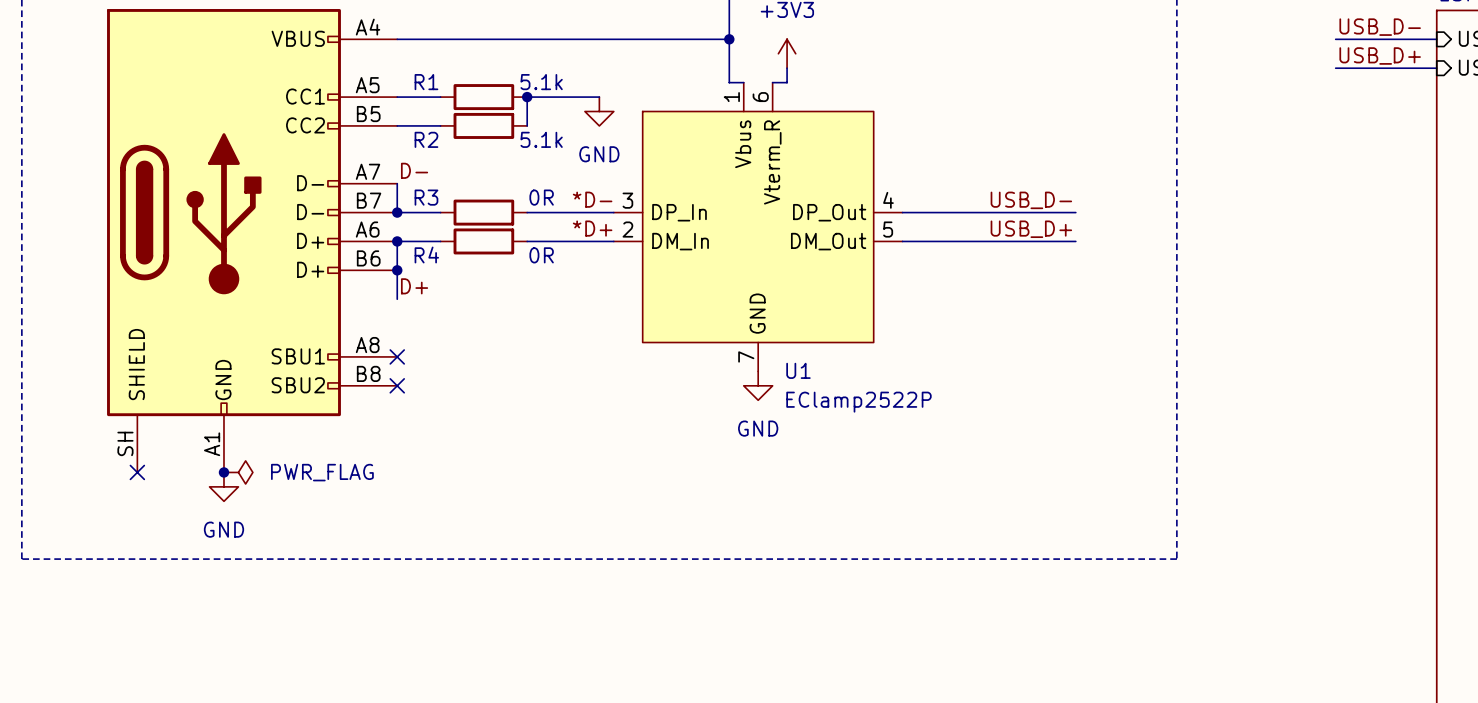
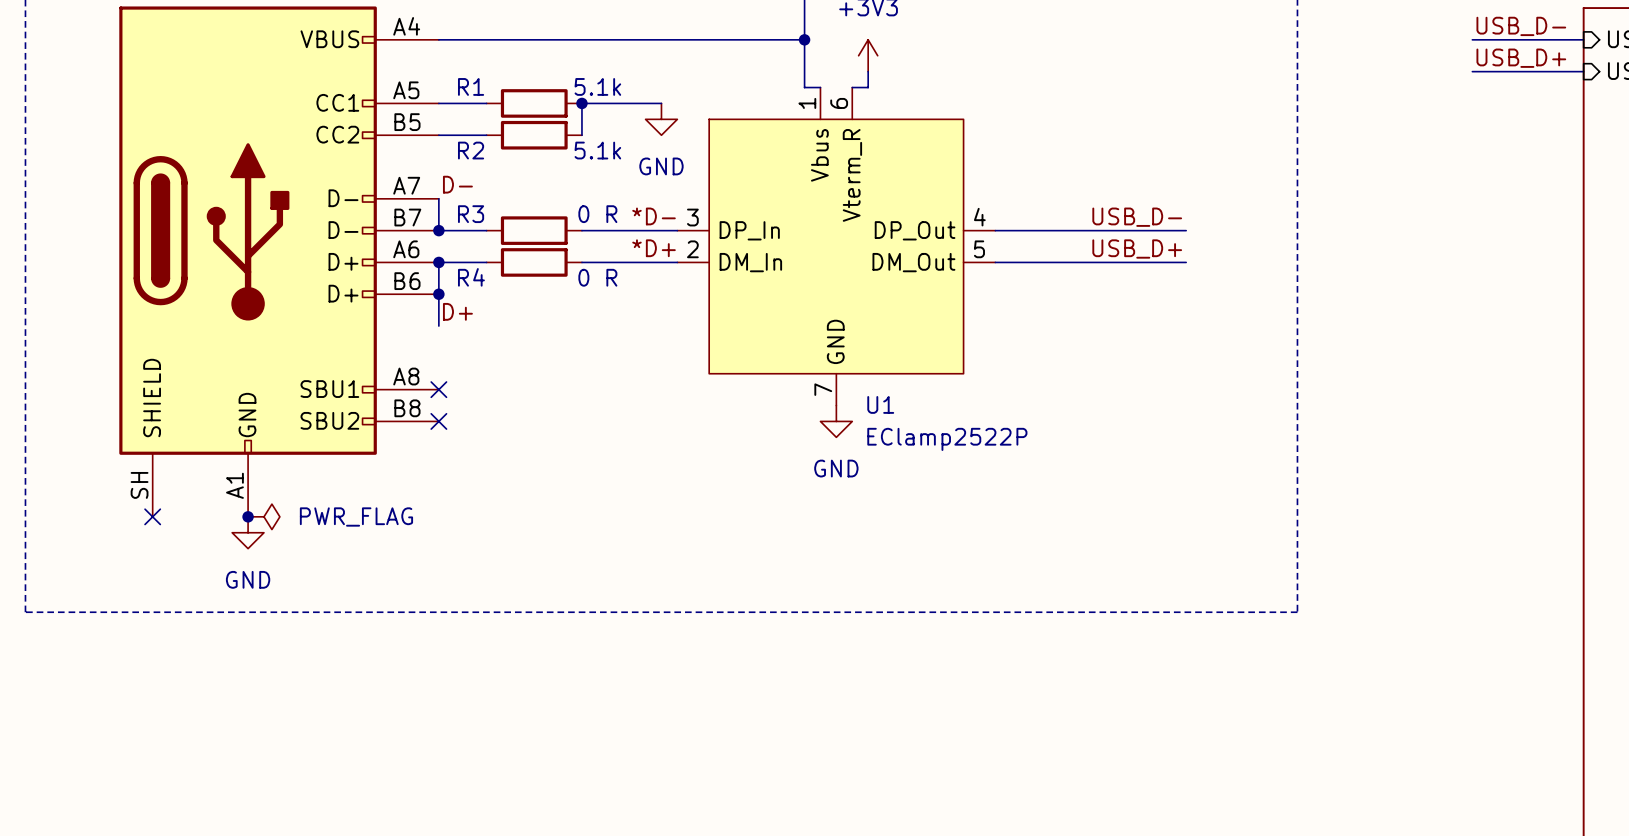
R3 value: 0R (541, 197) -> 0 R (597, 214)
R4 value: 0R (541, 255) -> 0 R (597, 277)

